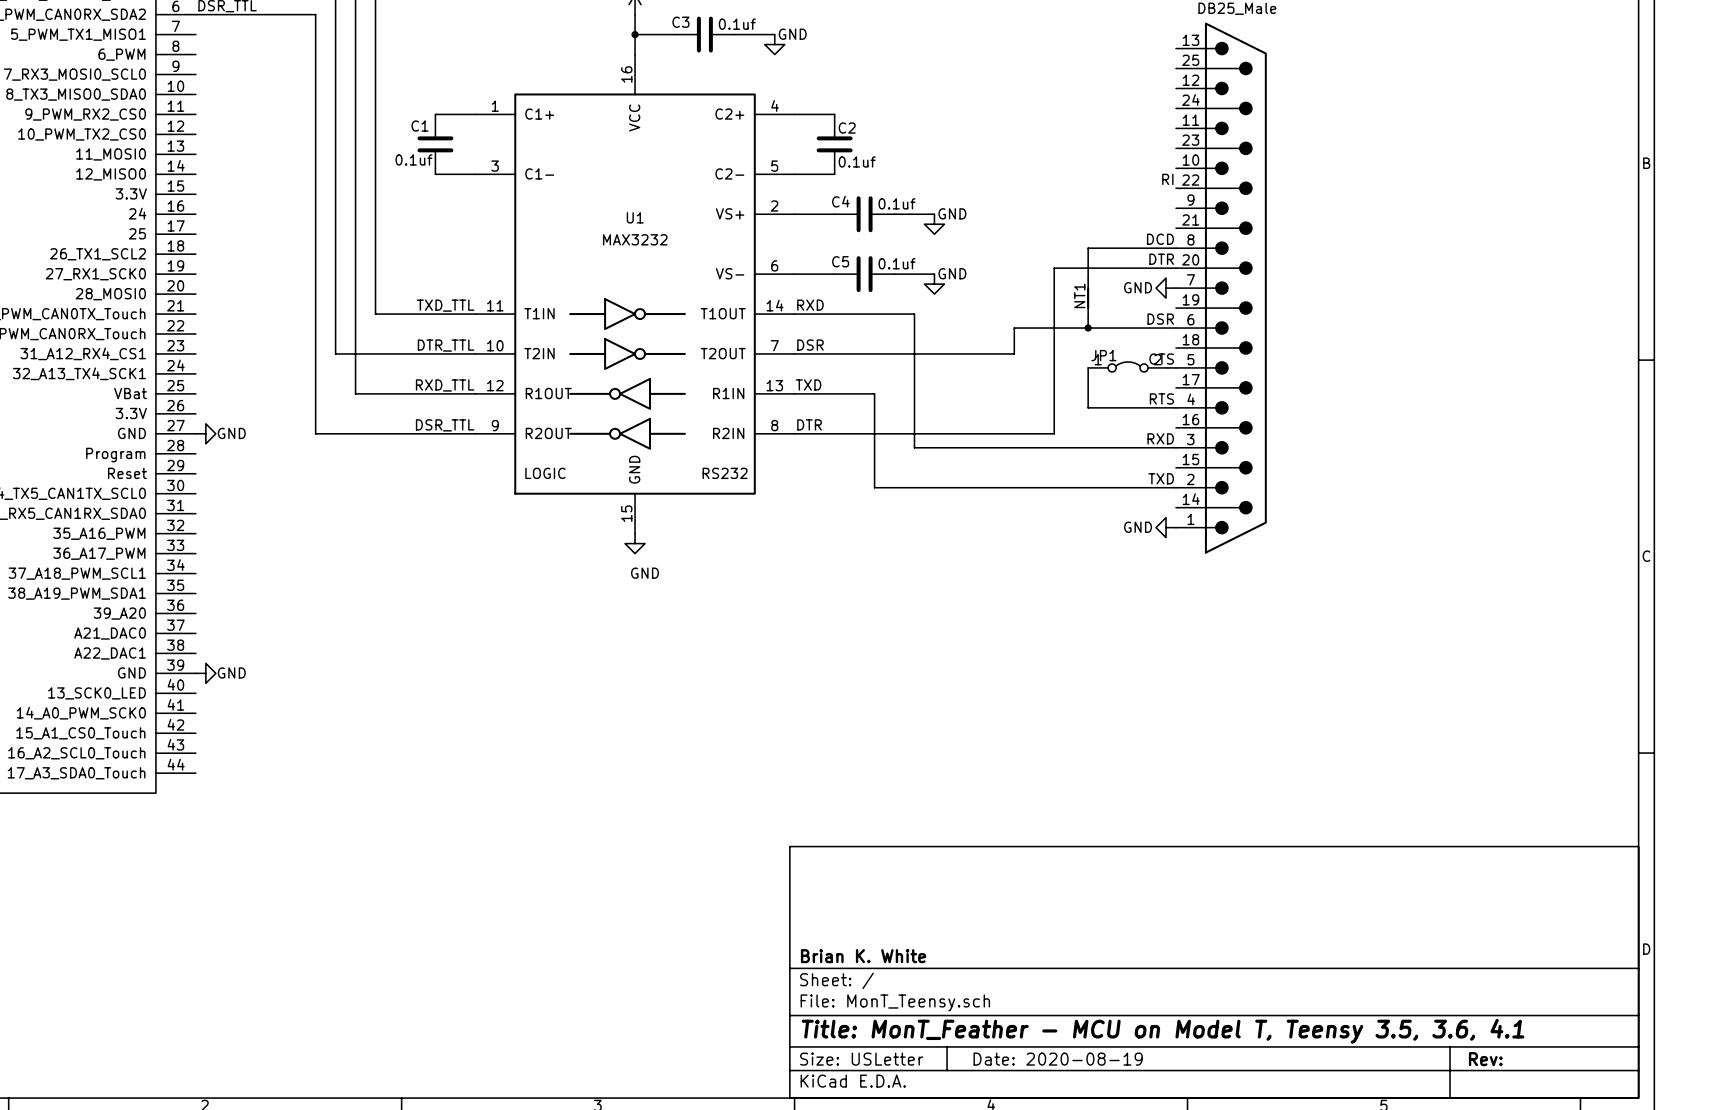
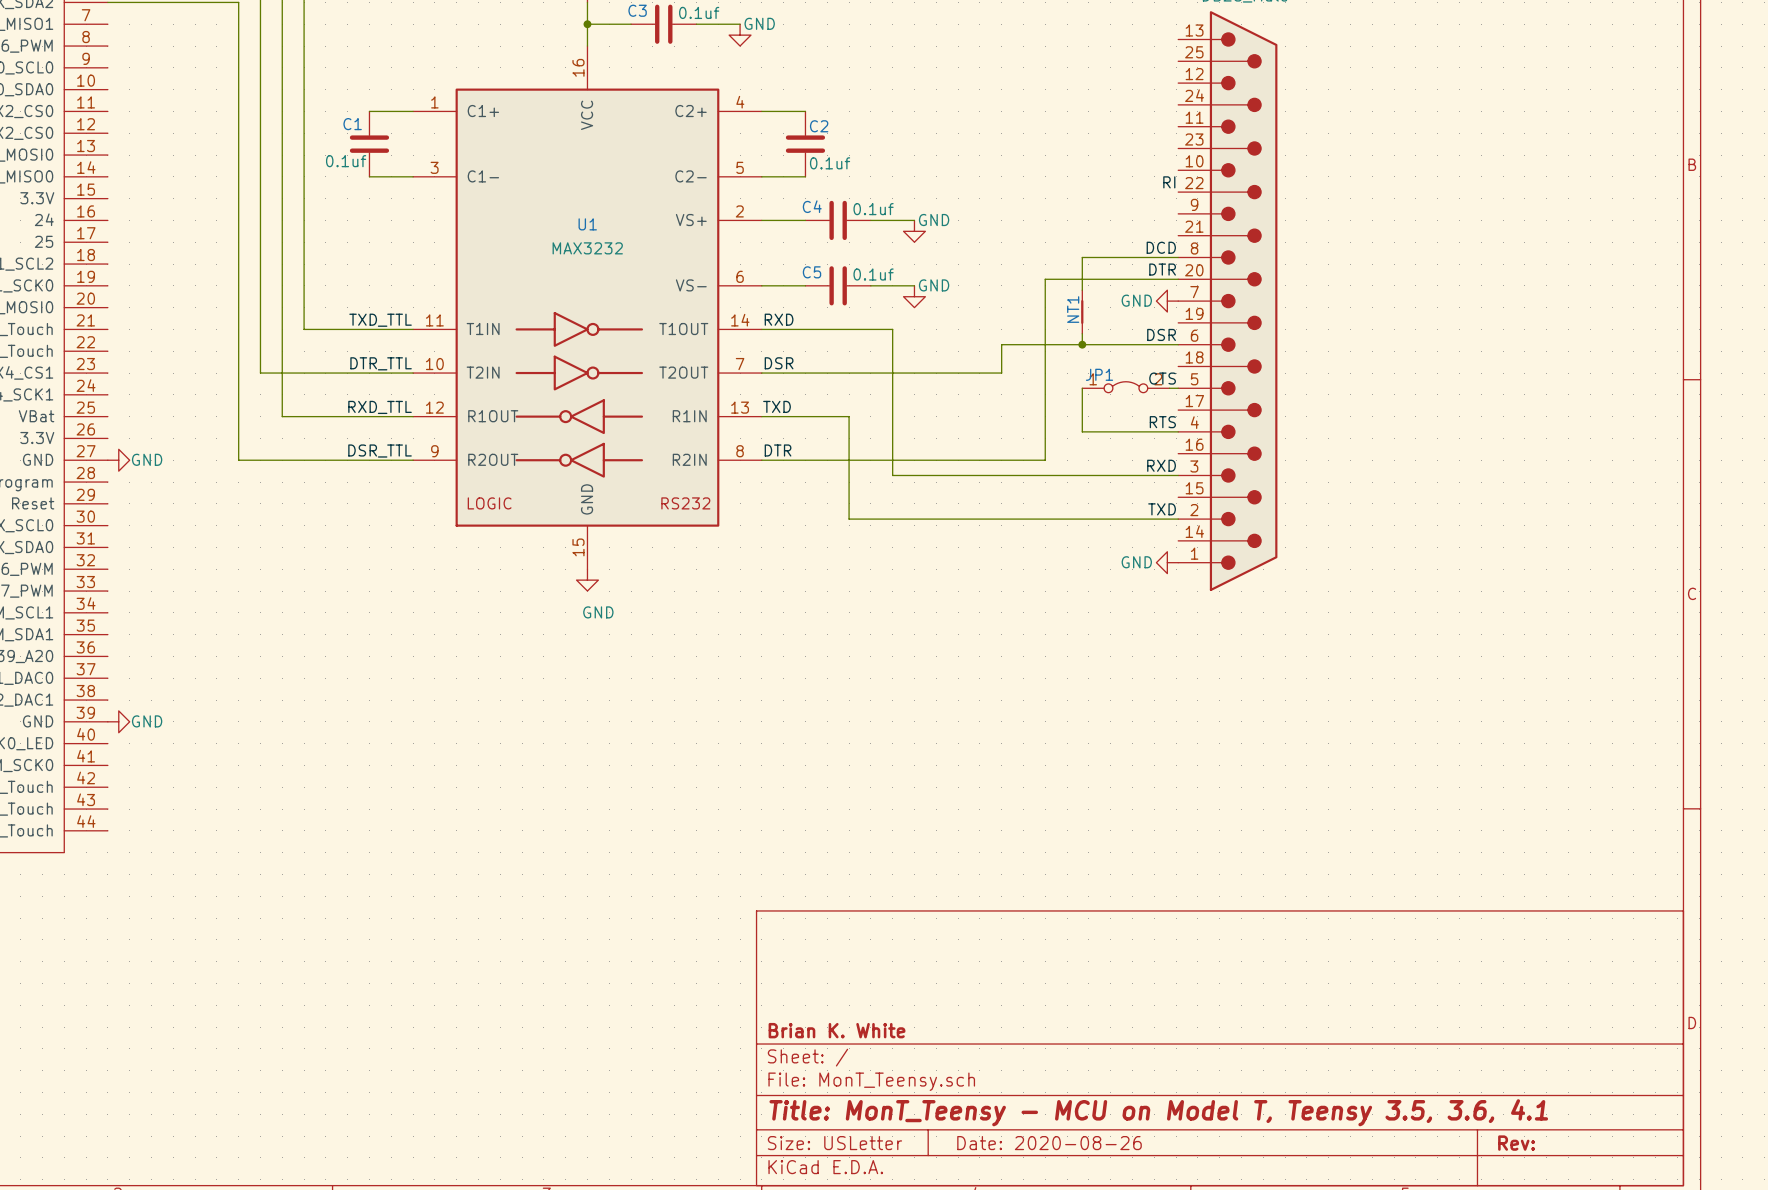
title block: Title: MonT_Feather - MCU on Model T, Teensy 3.5, 3.6, 4.1 (1163, 1031) -> Title: MonT_Teensy - MCU on Model T, Teensy 3.5, 3.6, 4.1 (1158, 1112)
title block: Date: 2020-08-19 (1058, 1059) -> Date: 2020-08-26 (1049, 1143)

